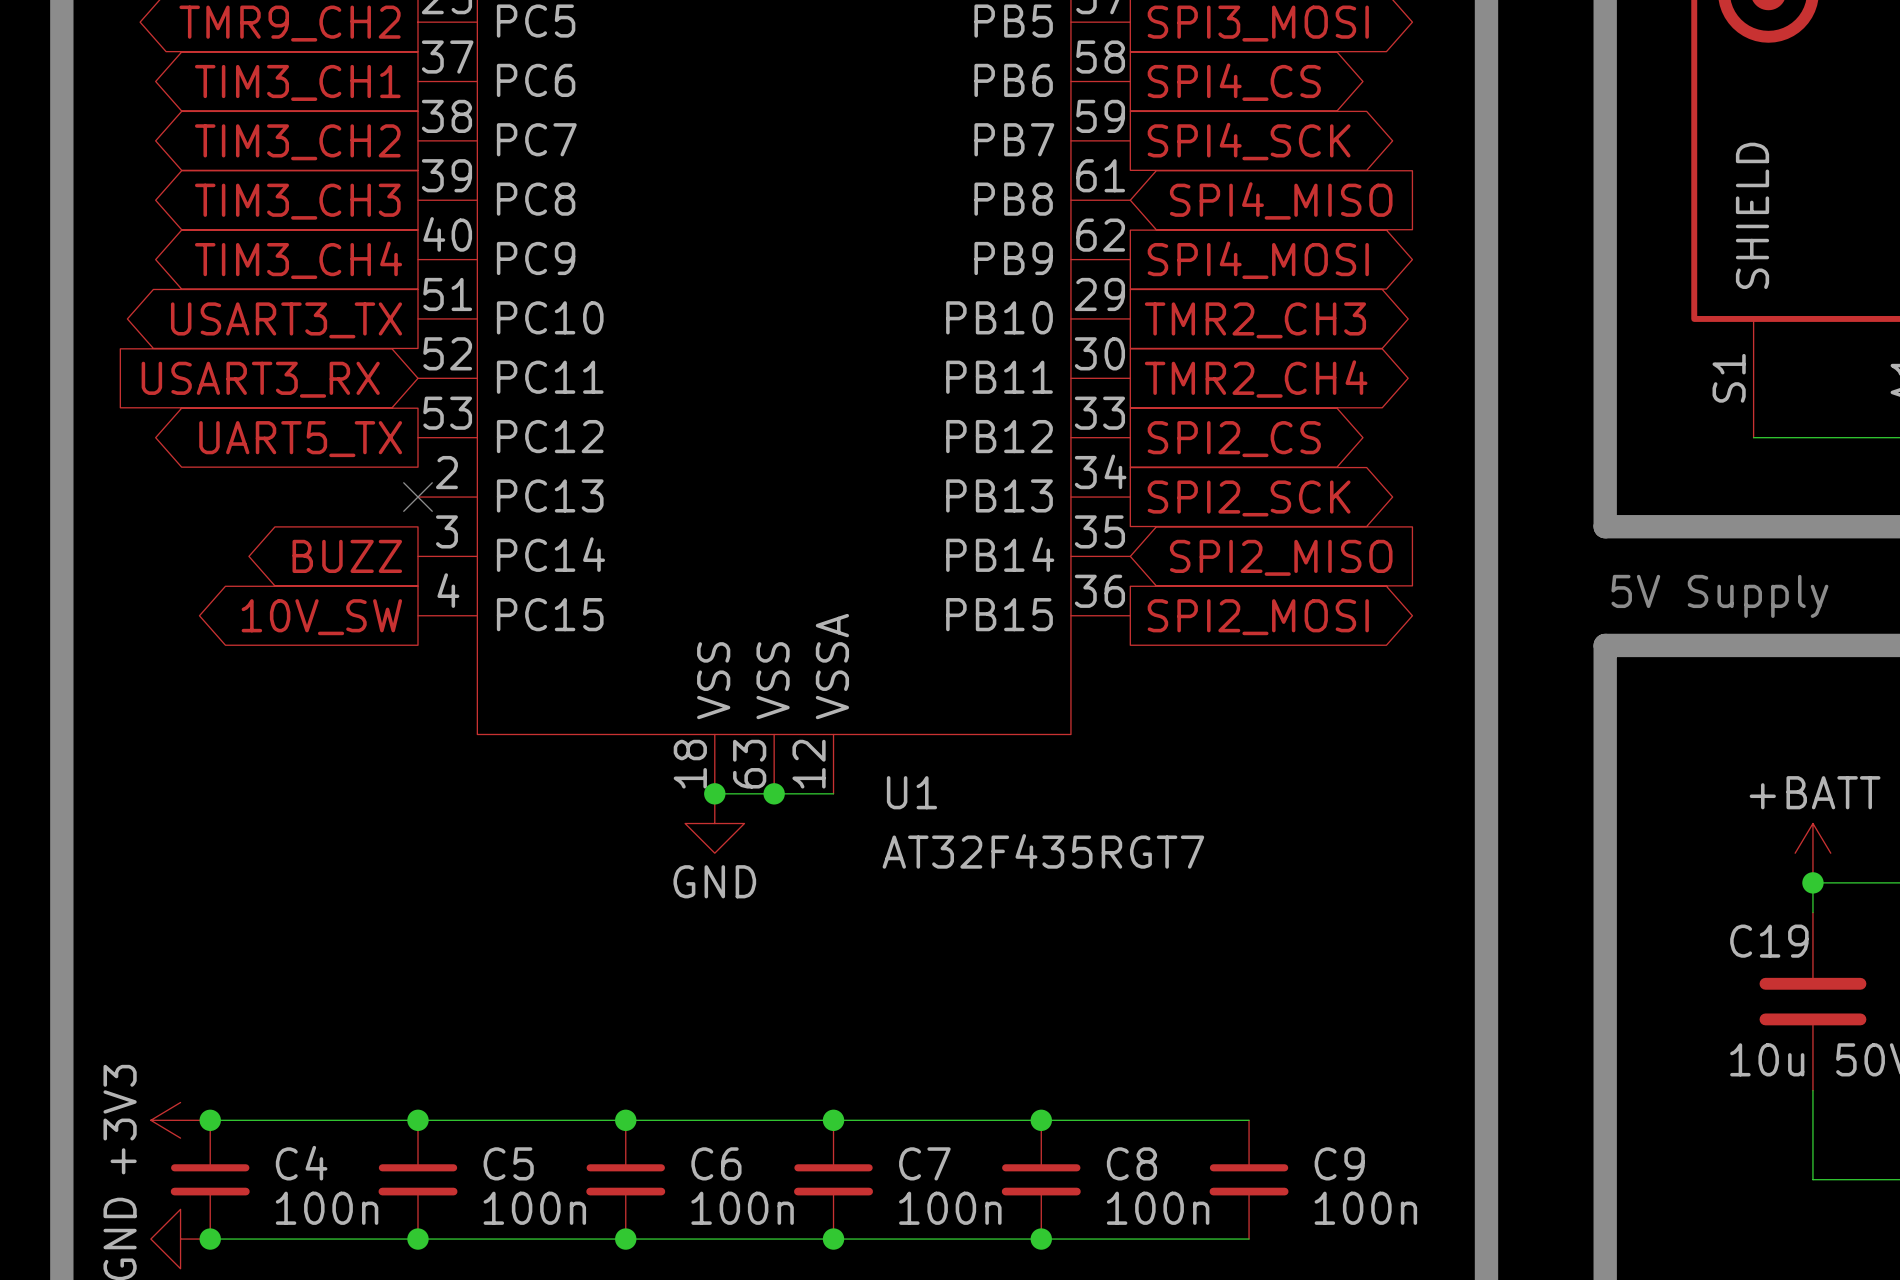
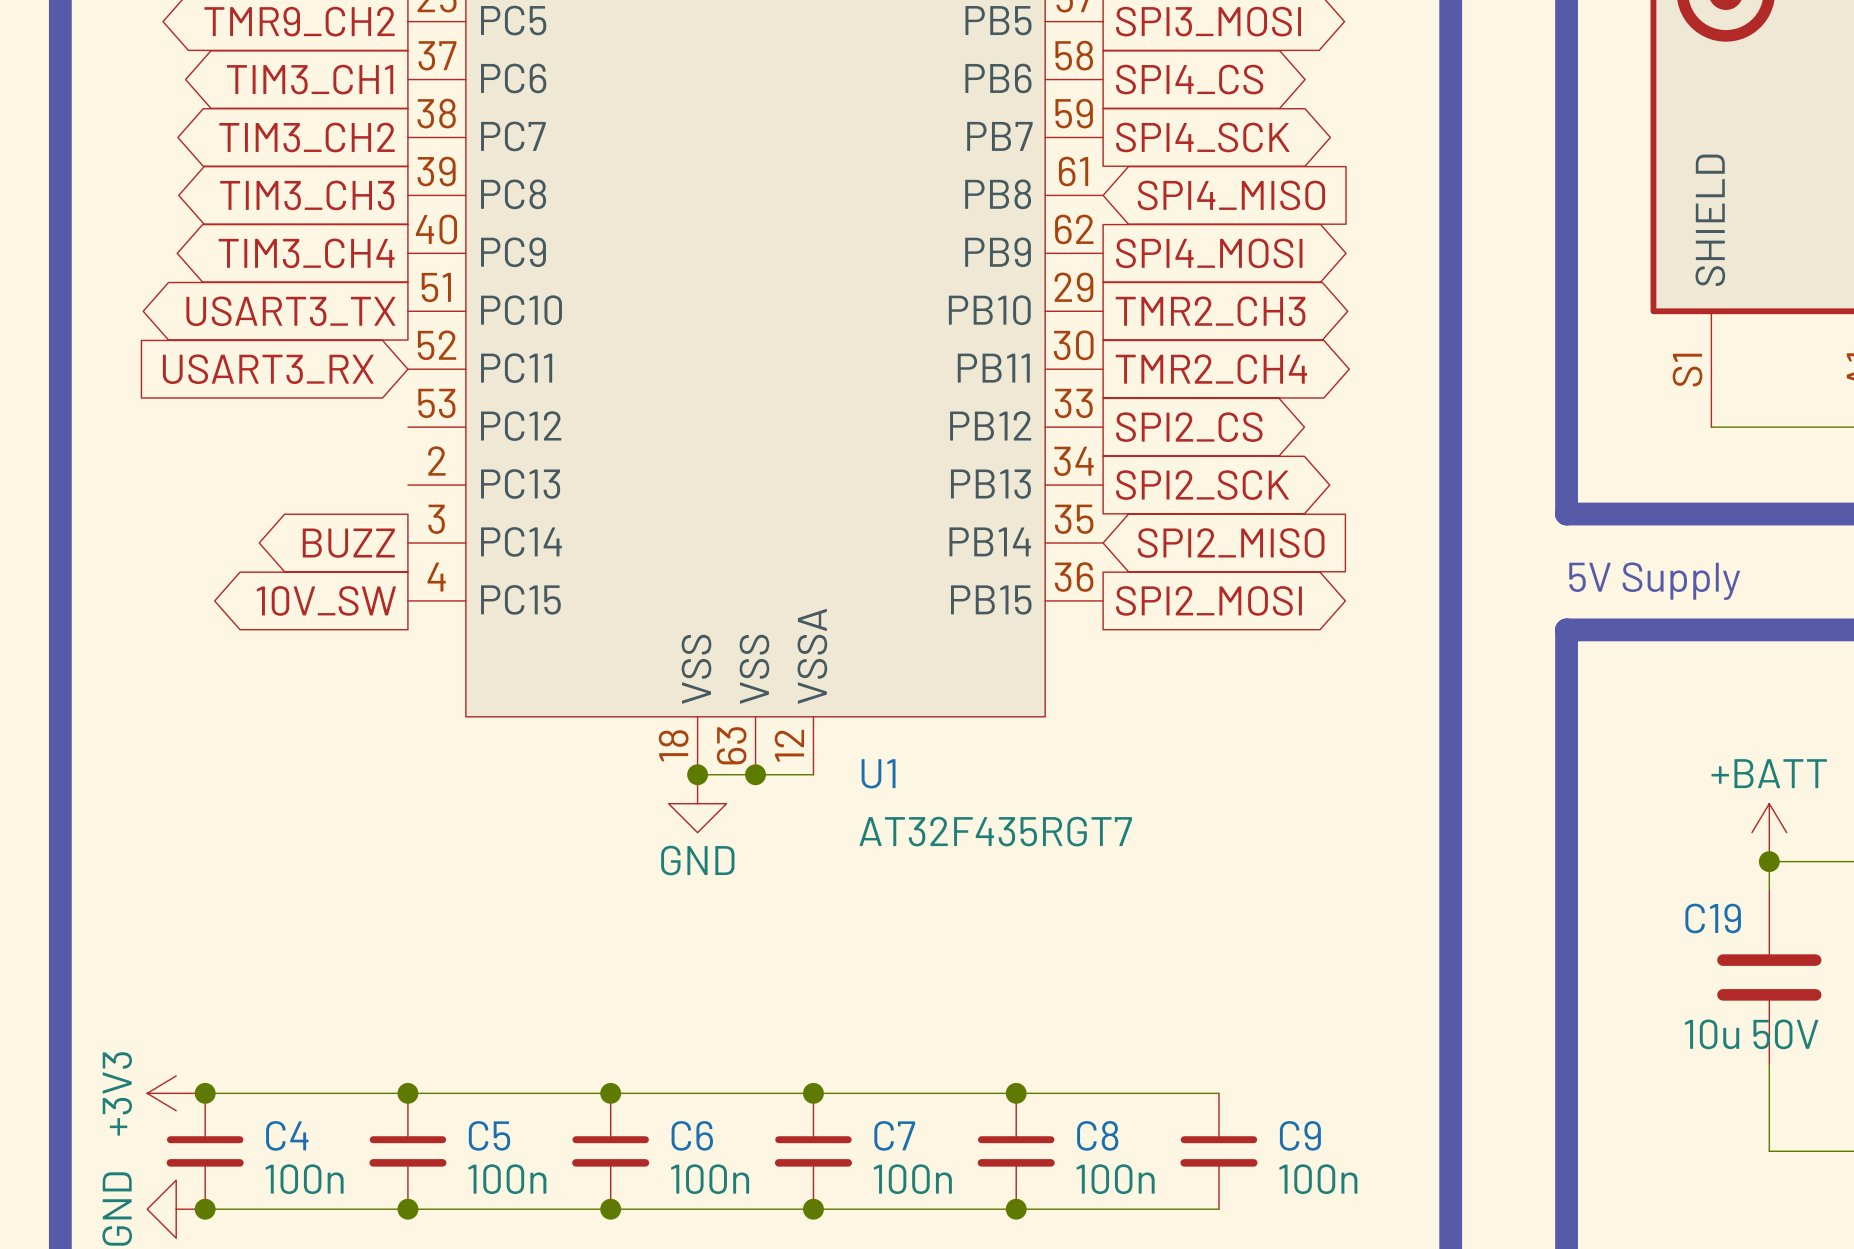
global label: UART5_TX (300, 439) -> none
no-connect mark: (417, 497) -> none

